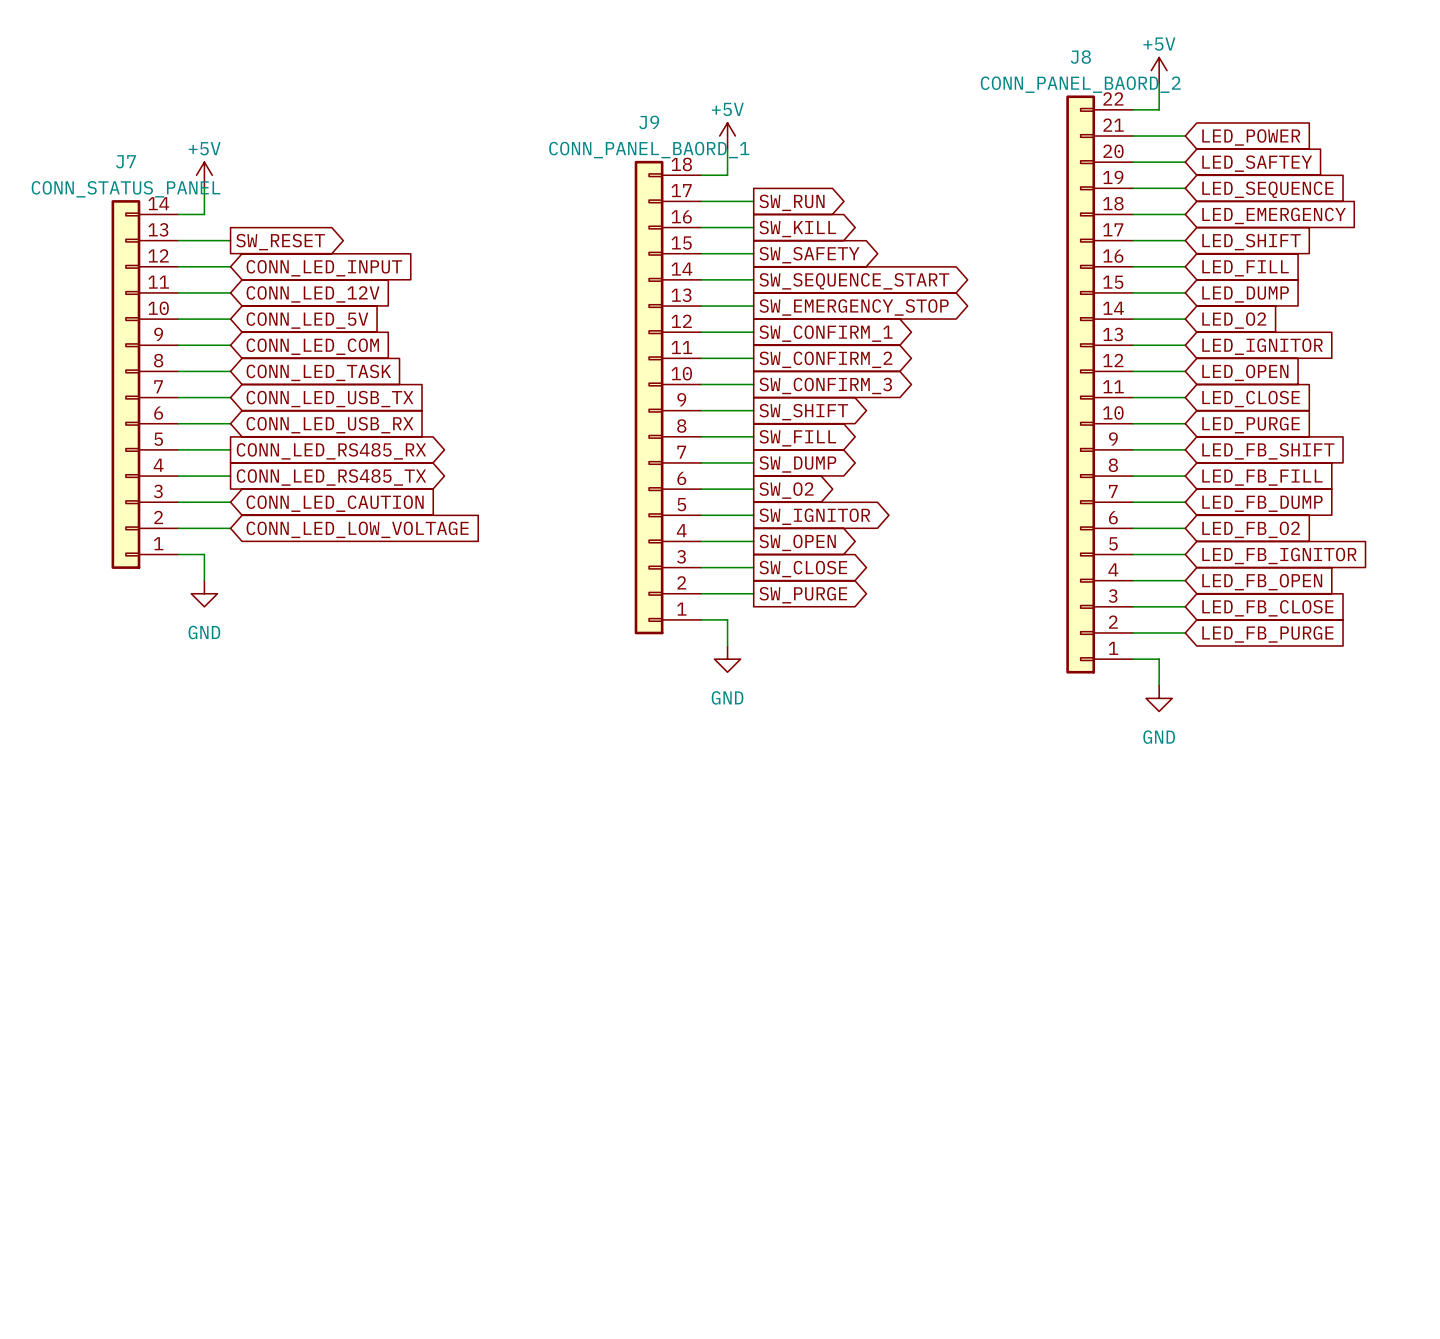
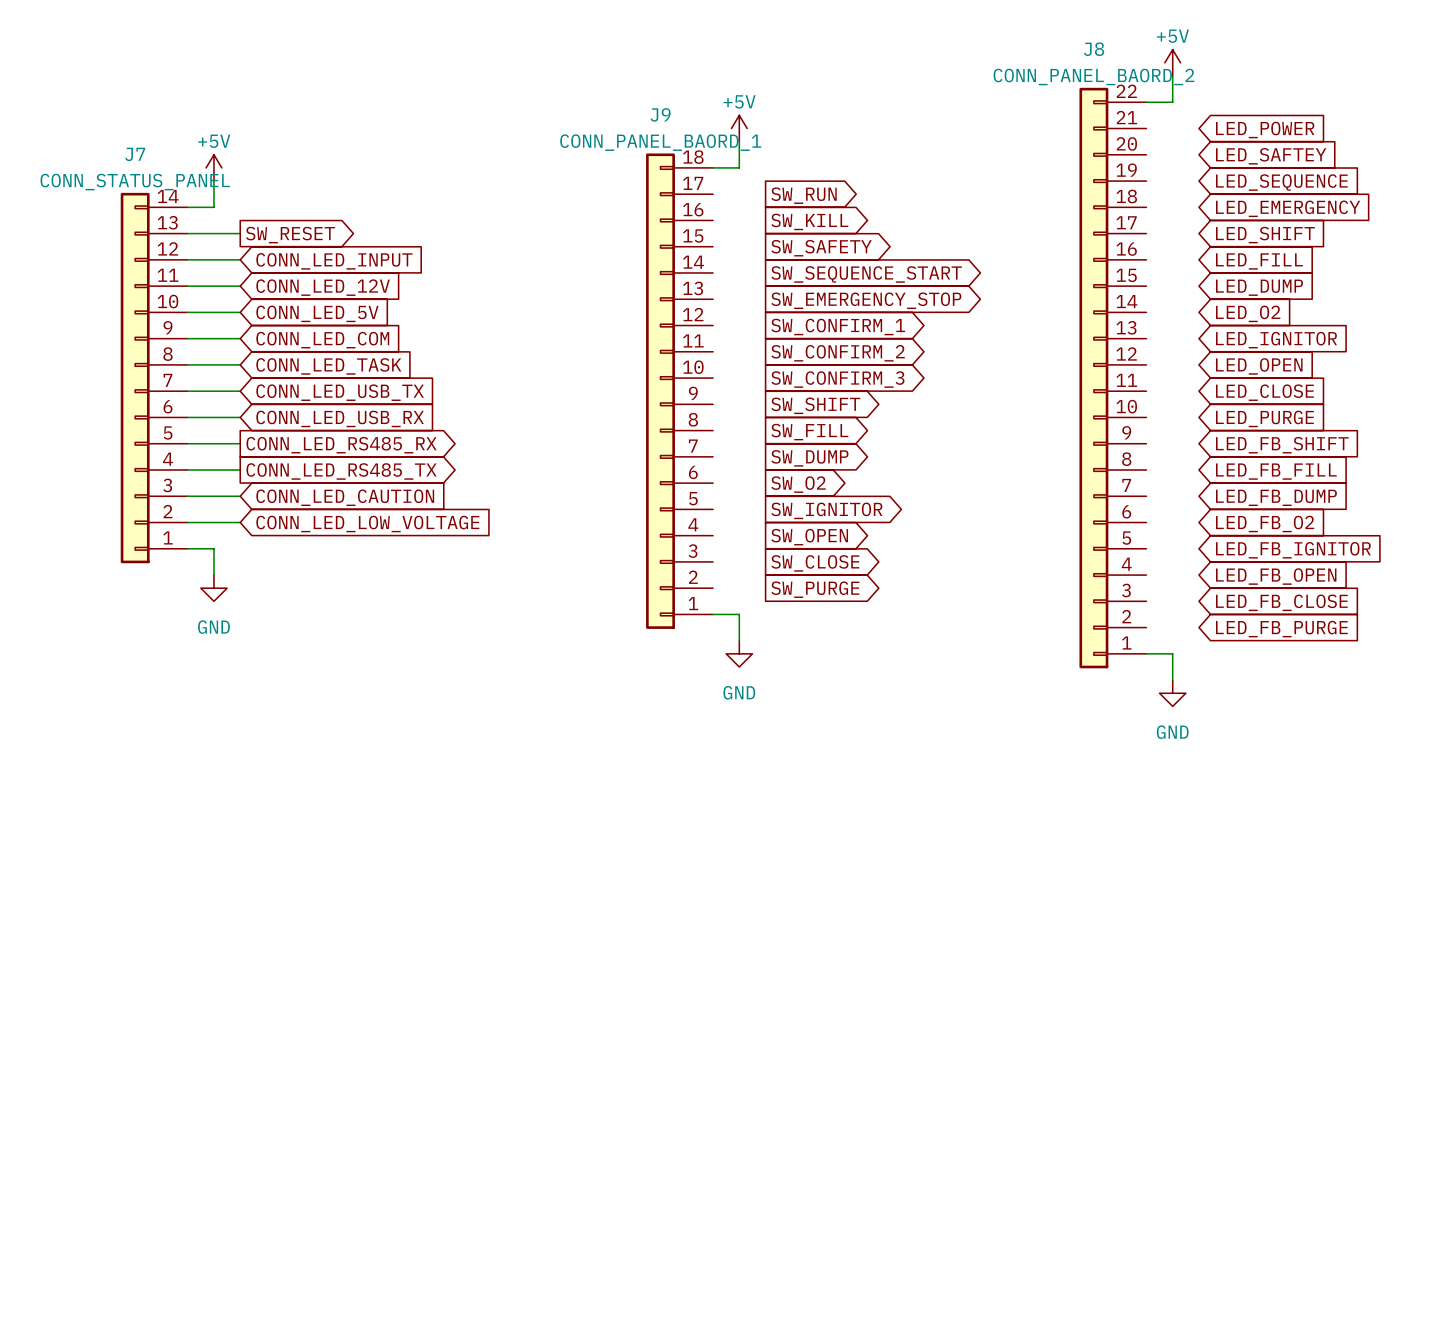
wire: (1132, 136) (1185, 136) -> none
wire: (1132, 162) (1185, 162) -> none
wire: (1132, 188) (1185, 188) -> none
wire: (701, 201) (753, 201) -> none
wire: (1132, 214) (1185, 214) -> none
wire: (701, 227) (753, 227) -> none
wire: (1132, 240) (1185, 240) -> none
wire: (701, 253) (753, 253) -> none
wire: (1132, 266) (1185, 266) -> none
wire: (701, 279) (753, 279) -> none
wire: (1132, 292) (1185, 292) -> none
wire: (701, 306) (753, 306) -> none
wire: (1132, 319) (1185, 319) -> none
wire: (701, 332) (753, 332) -> none
wire: (1132, 345) (1185, 345) -> none
wire: (701, 358) (753, 358) -> none
wire: (1132, 371) (1185, 371) -> none
wire: (701, 384) (753, 384) -> none
wire: (1132, 397) (1185, 397) -> none
wire: (701, 410) (753, 410) -> none
wire: (1132, 423) (1185, 423) -> none
wire: (701, 436) (753, 436) -> none
wire: (1132, 449) (1185, 449) -> none
wire: (701, 462) (753, 462) -> none
wire: (1132, 476) (1185, 476) -> none
wire: (701, 489) (753, 489) -> none
wire: (1132, 502) (1185, 502) -> none
wire: (701, 515) (753, 515) -> none
wire: (1132, 528) (1185, 528) -> none
wire: (701, 541) (753, 541) -> none
wire: (1132, 554) (1185, 554) -> none
wire: (701, 567) (753, 567) -> none
wire: (1132, 580) (1185, 580) -> none
wire: (701, 593) (753, 593) -> none
wire: (1132, 606) (1185, 606) -> none
wire: (1132, 632) (1185, 632) -> none

